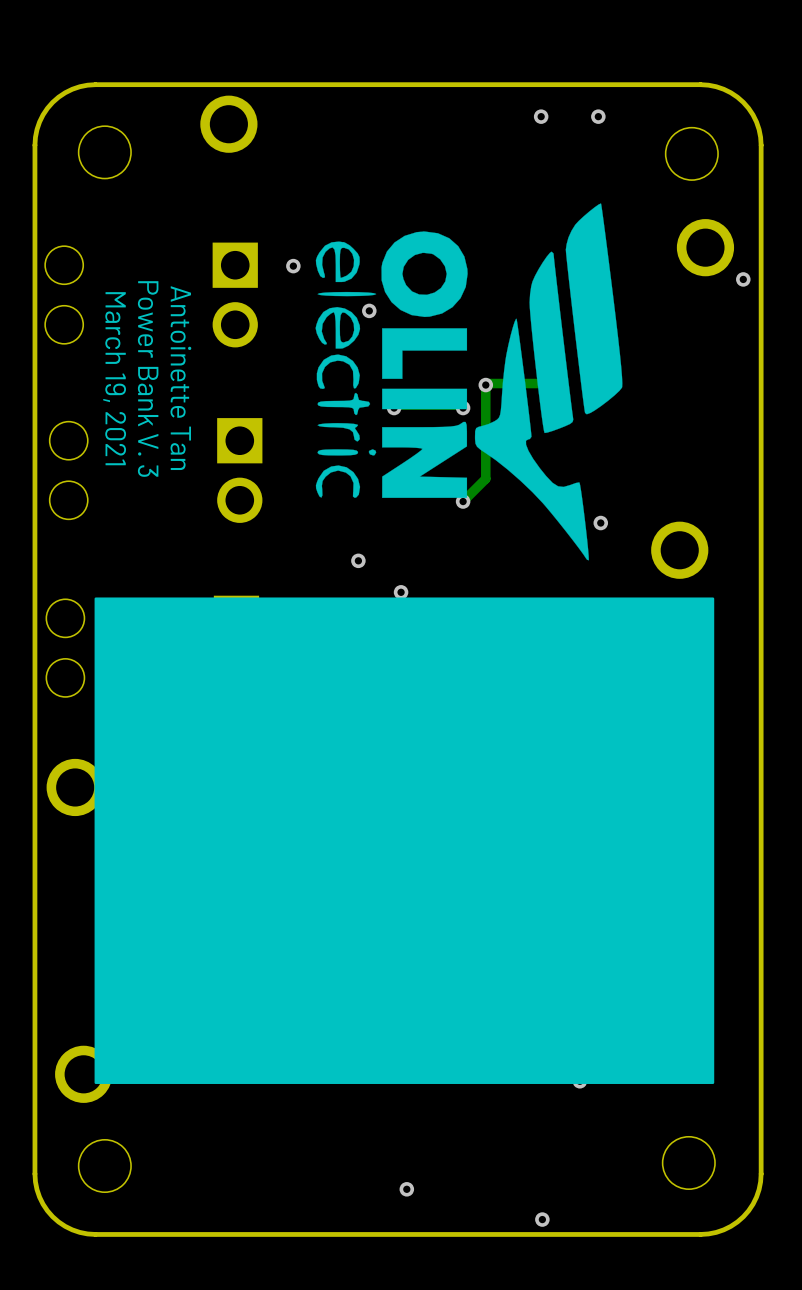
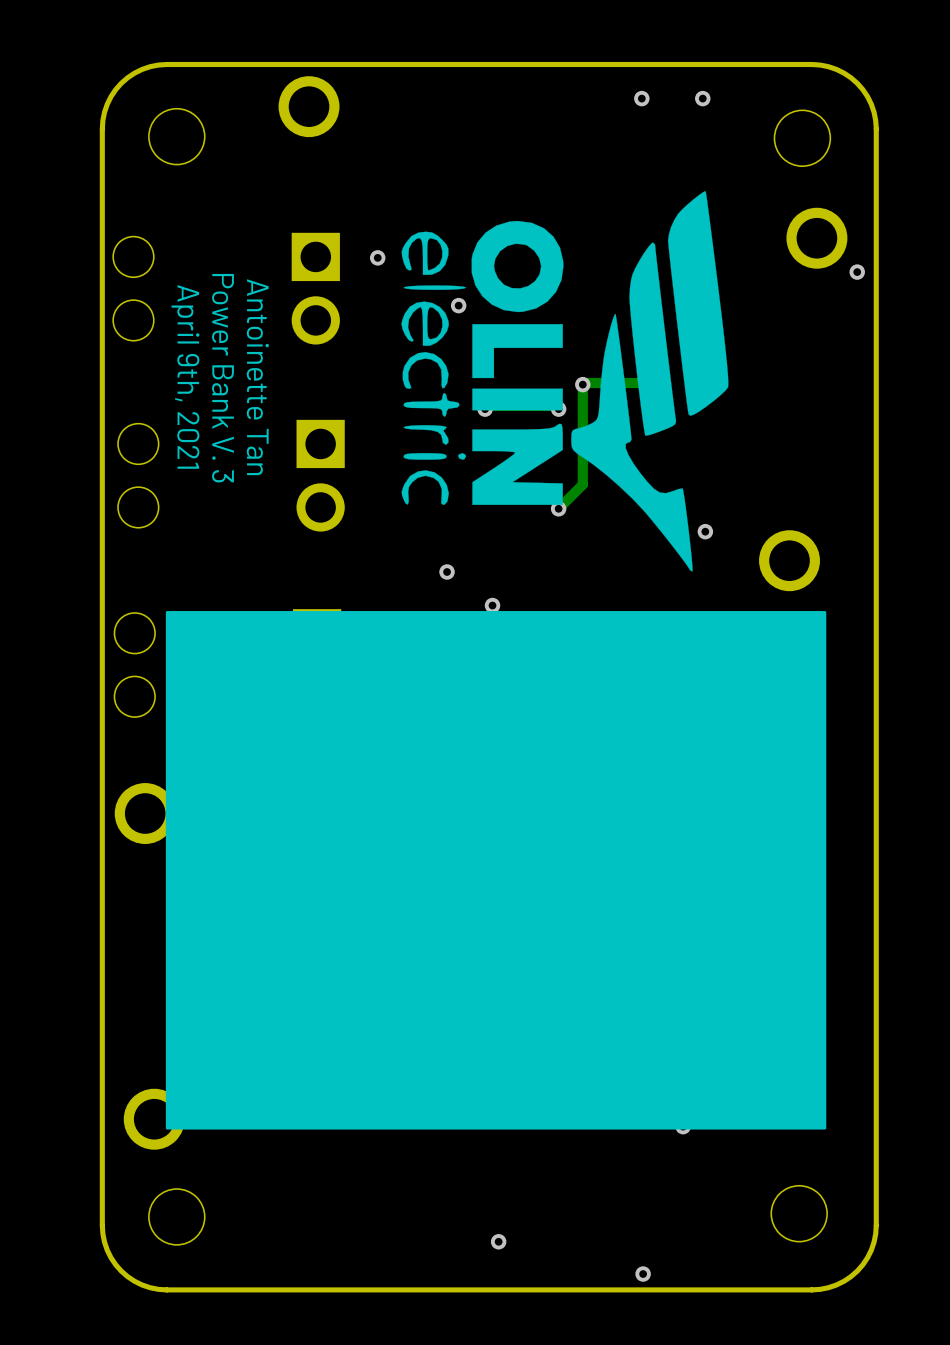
text: March 19, 2021 (114, 378) -> April 9th, 2021 (185, 376)

